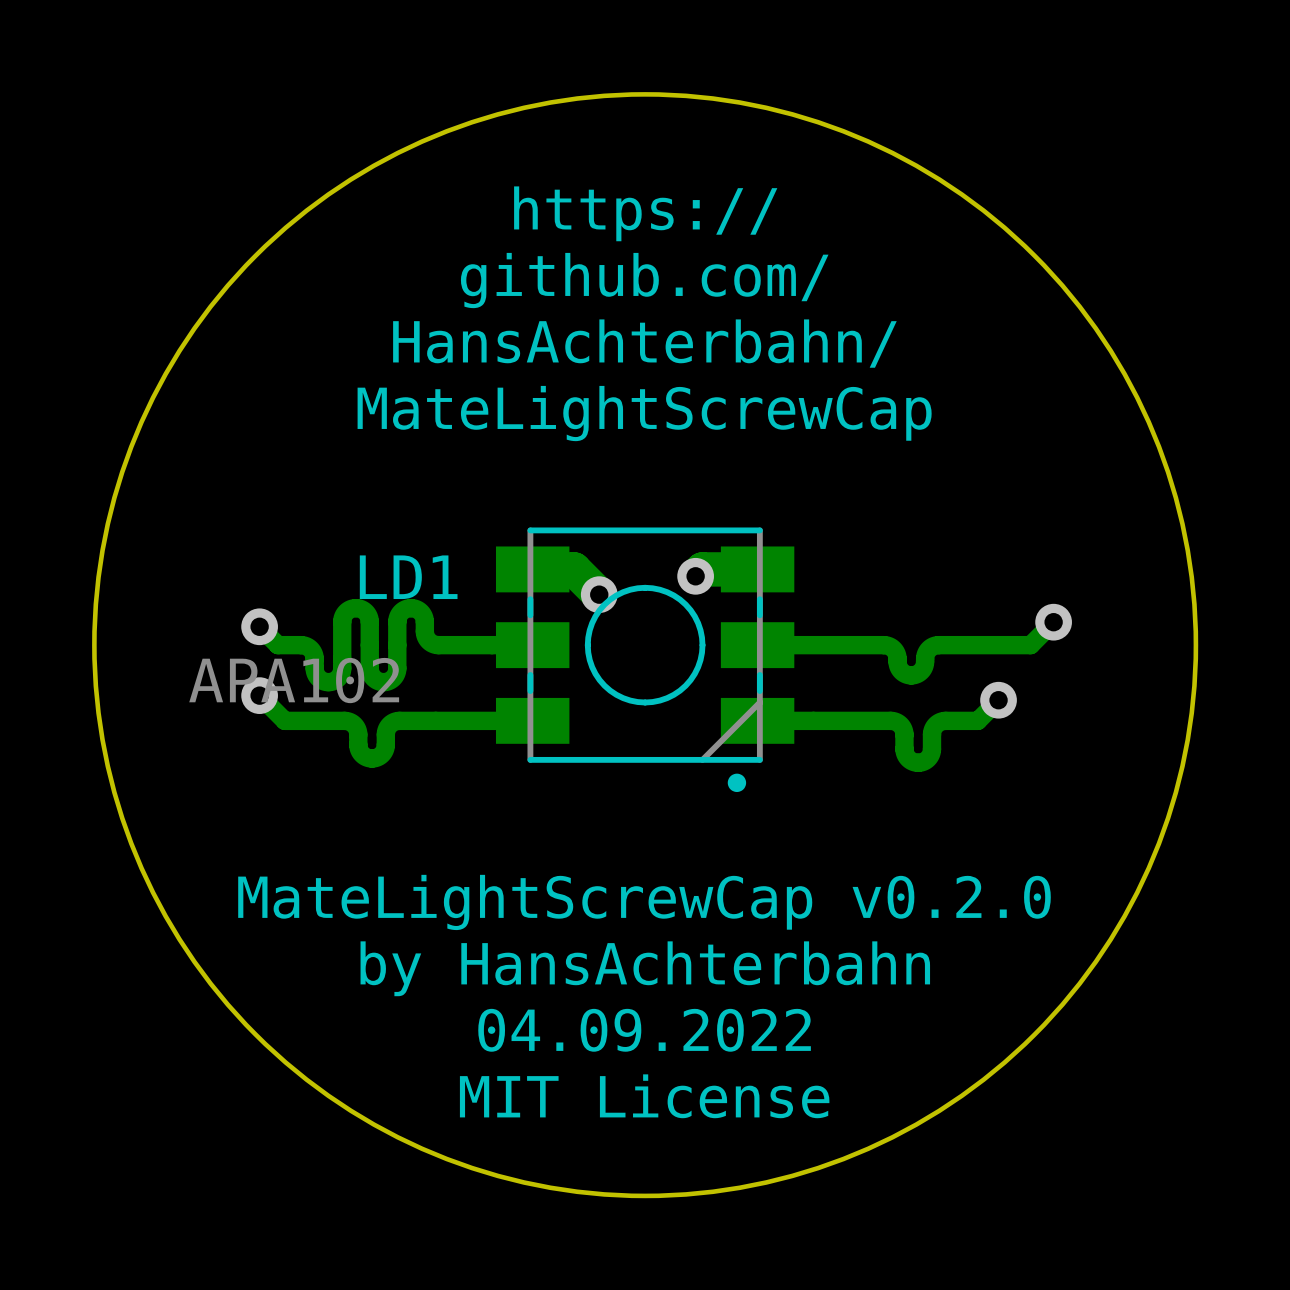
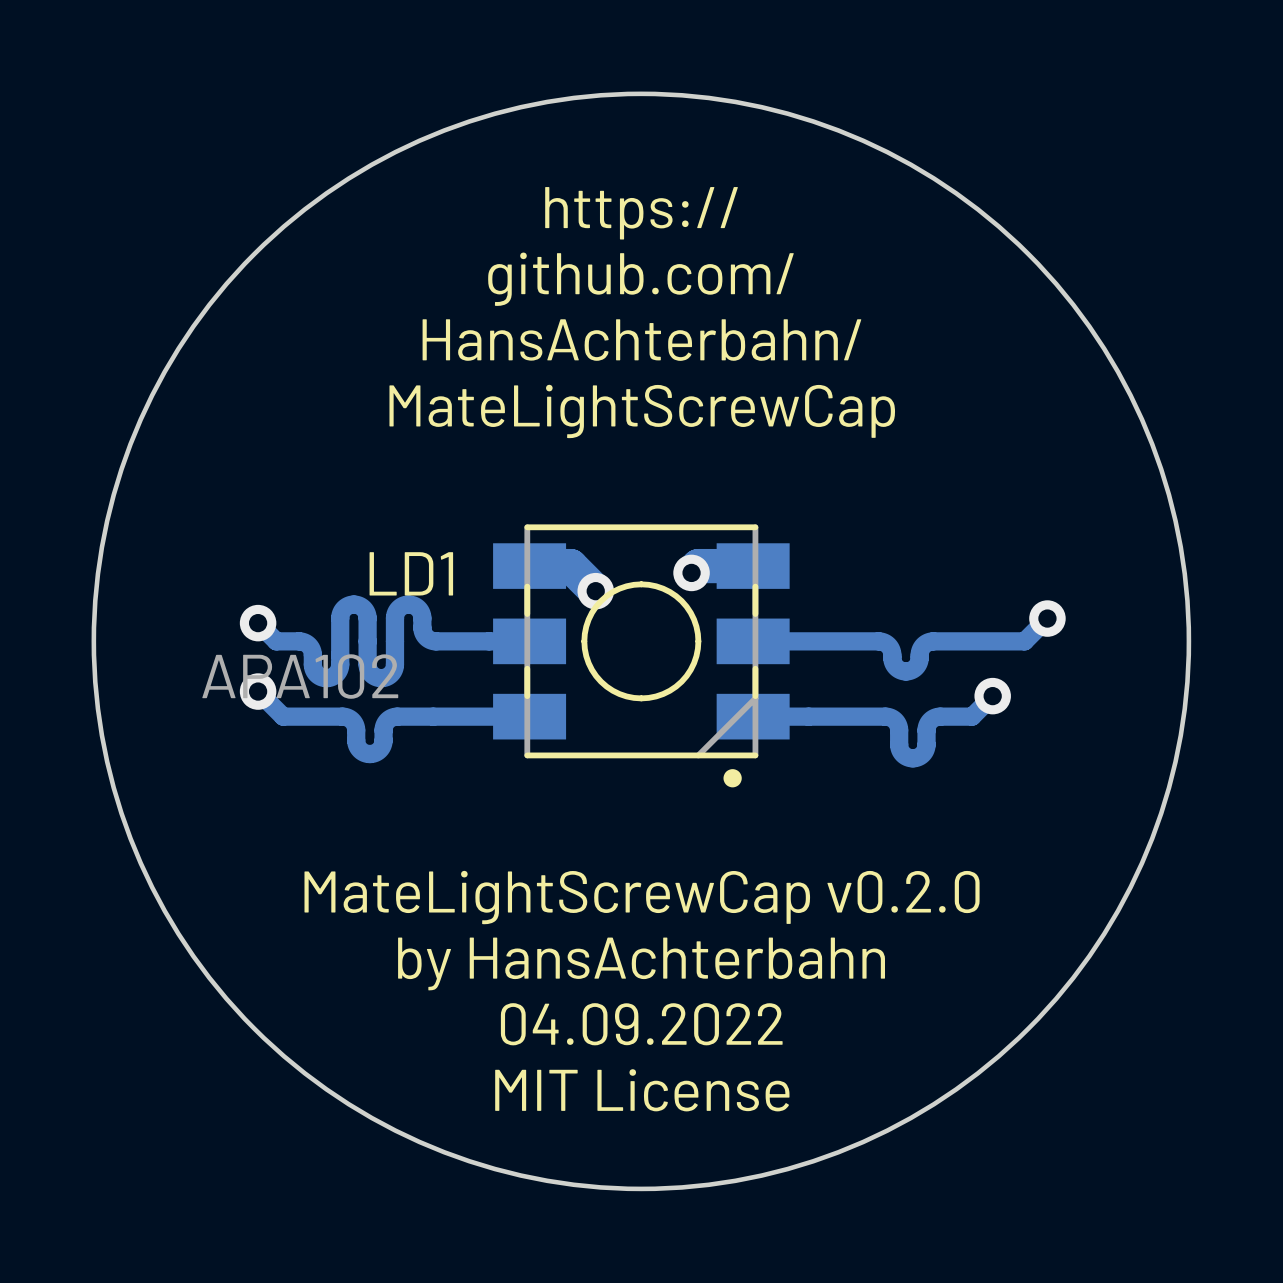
LD1 footprint: [495, 527, 795, 793] -> [493, 524, 790, 788]

